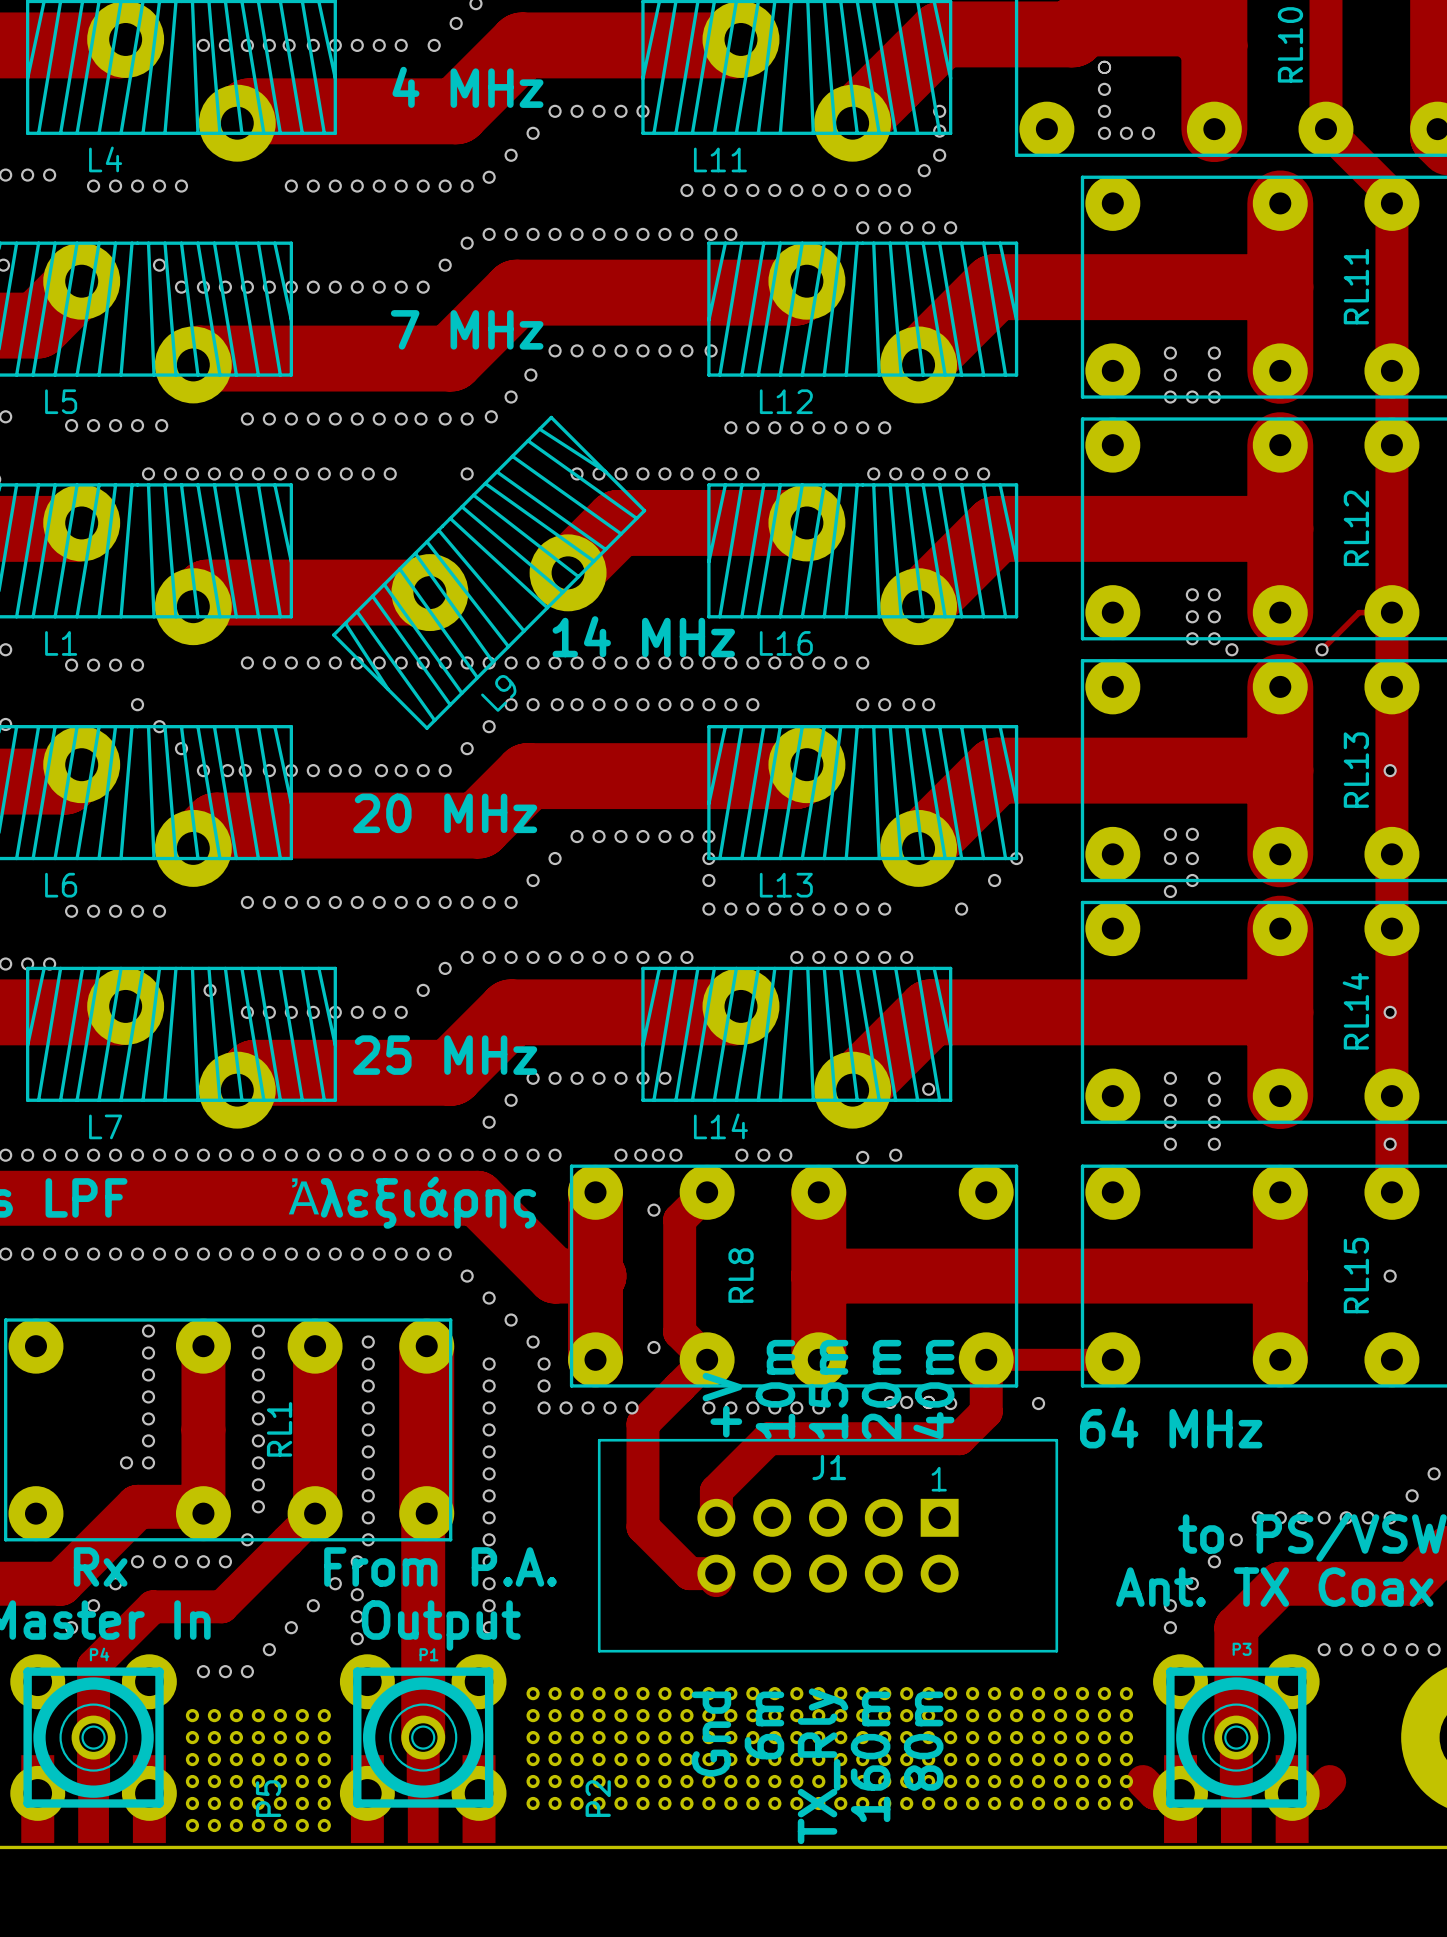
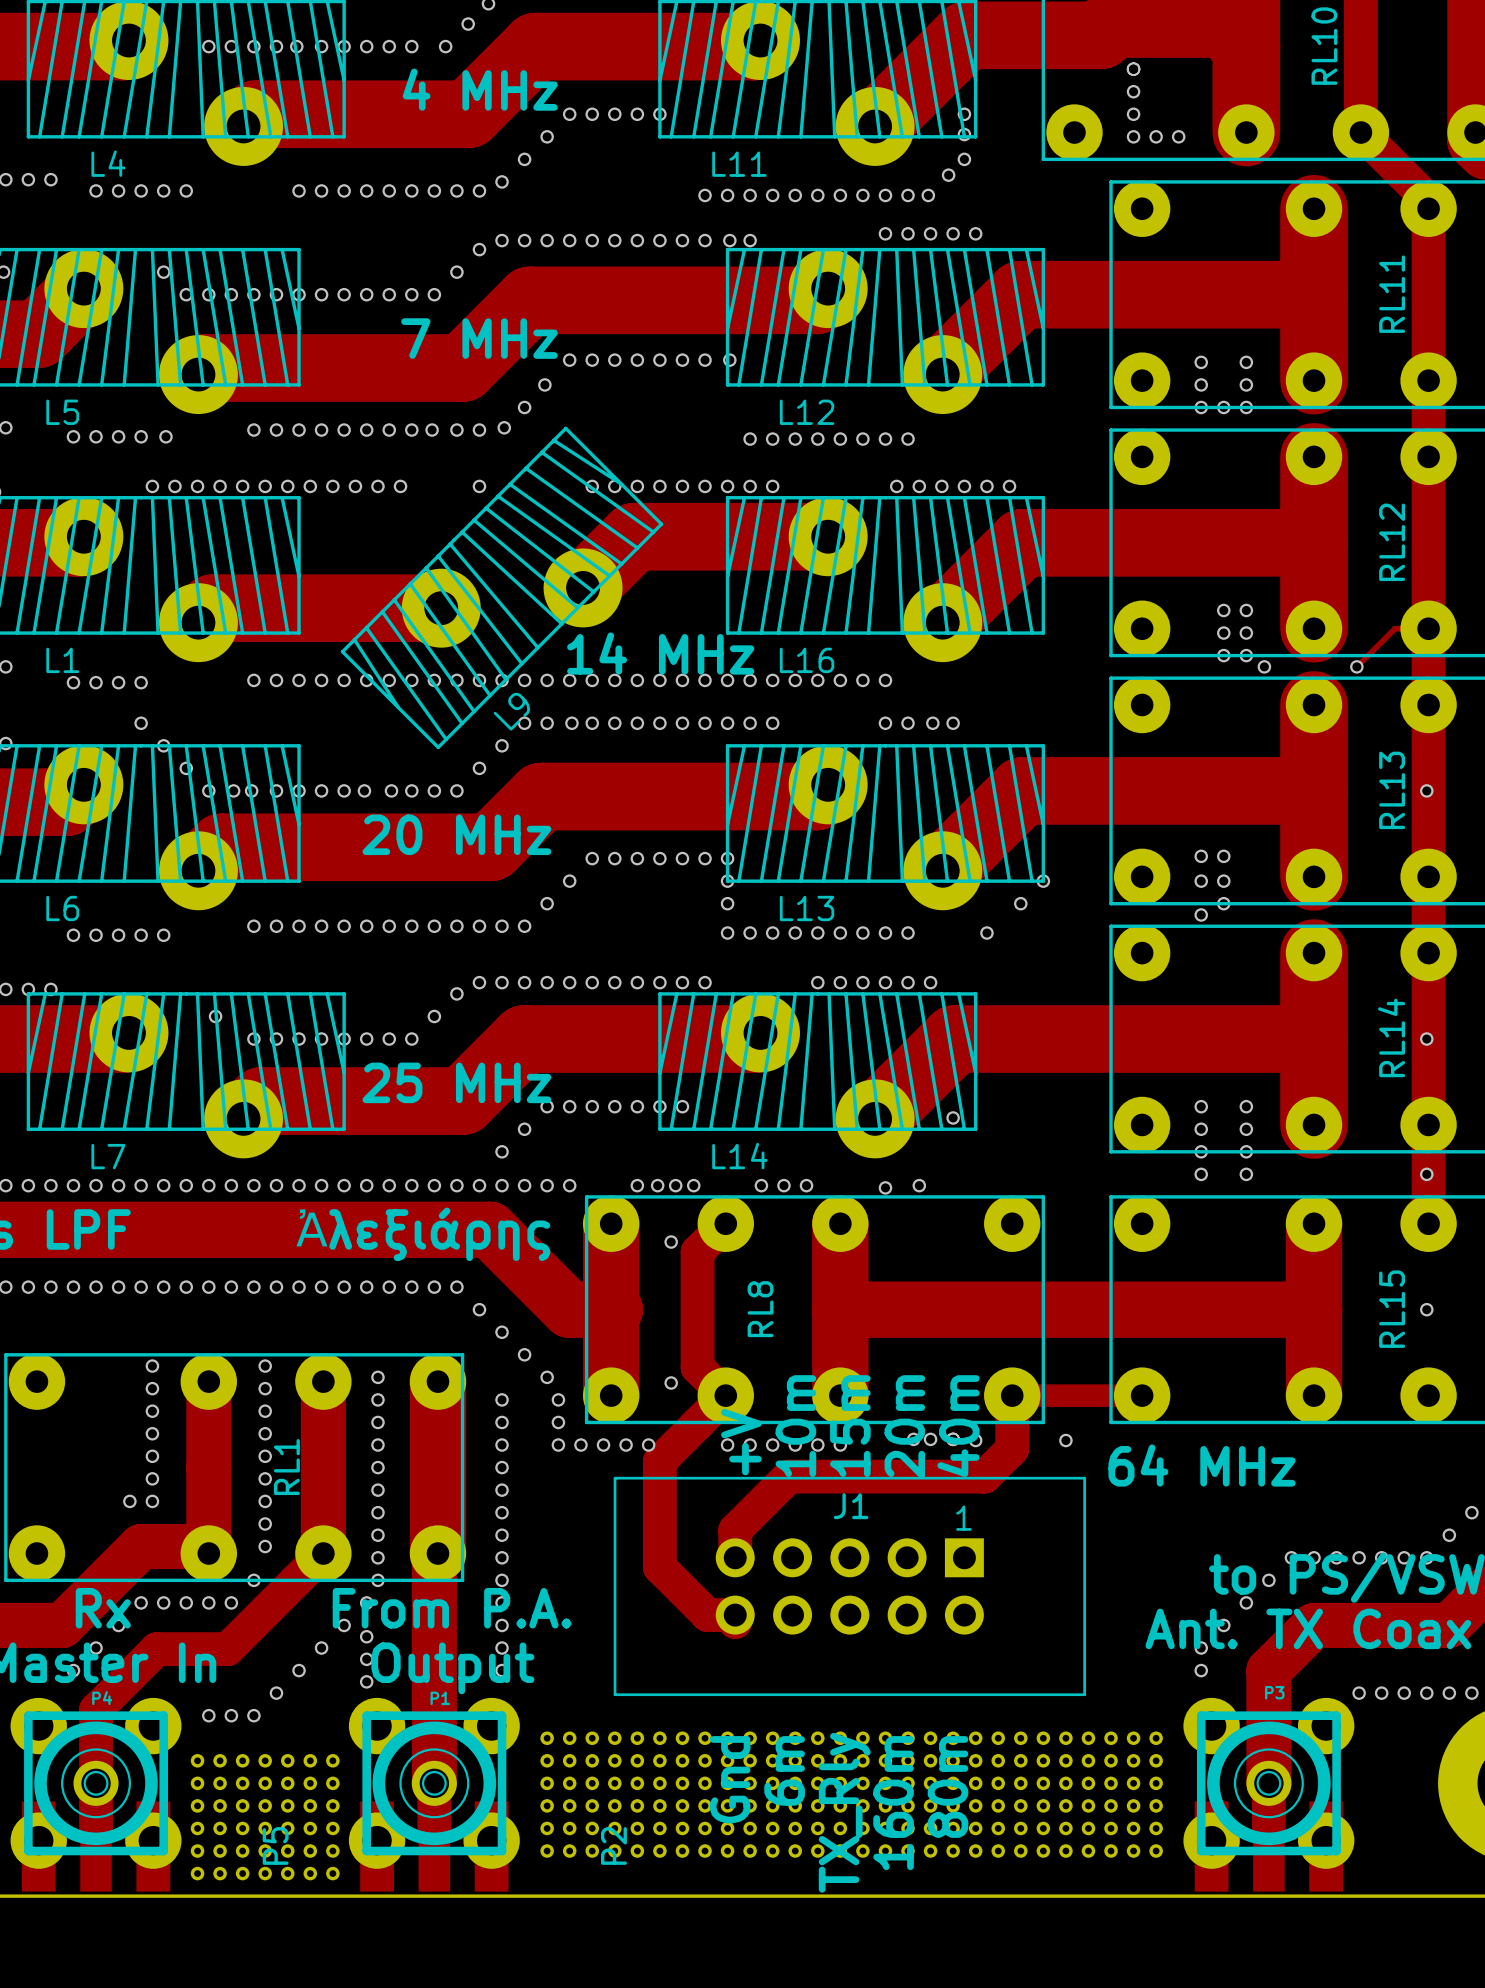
track: (1142, 1781) (1154, 1793) (1180, 1793) -> none
track: (1329, 1781) (1317, 1793) (1292, 1793) -> none

